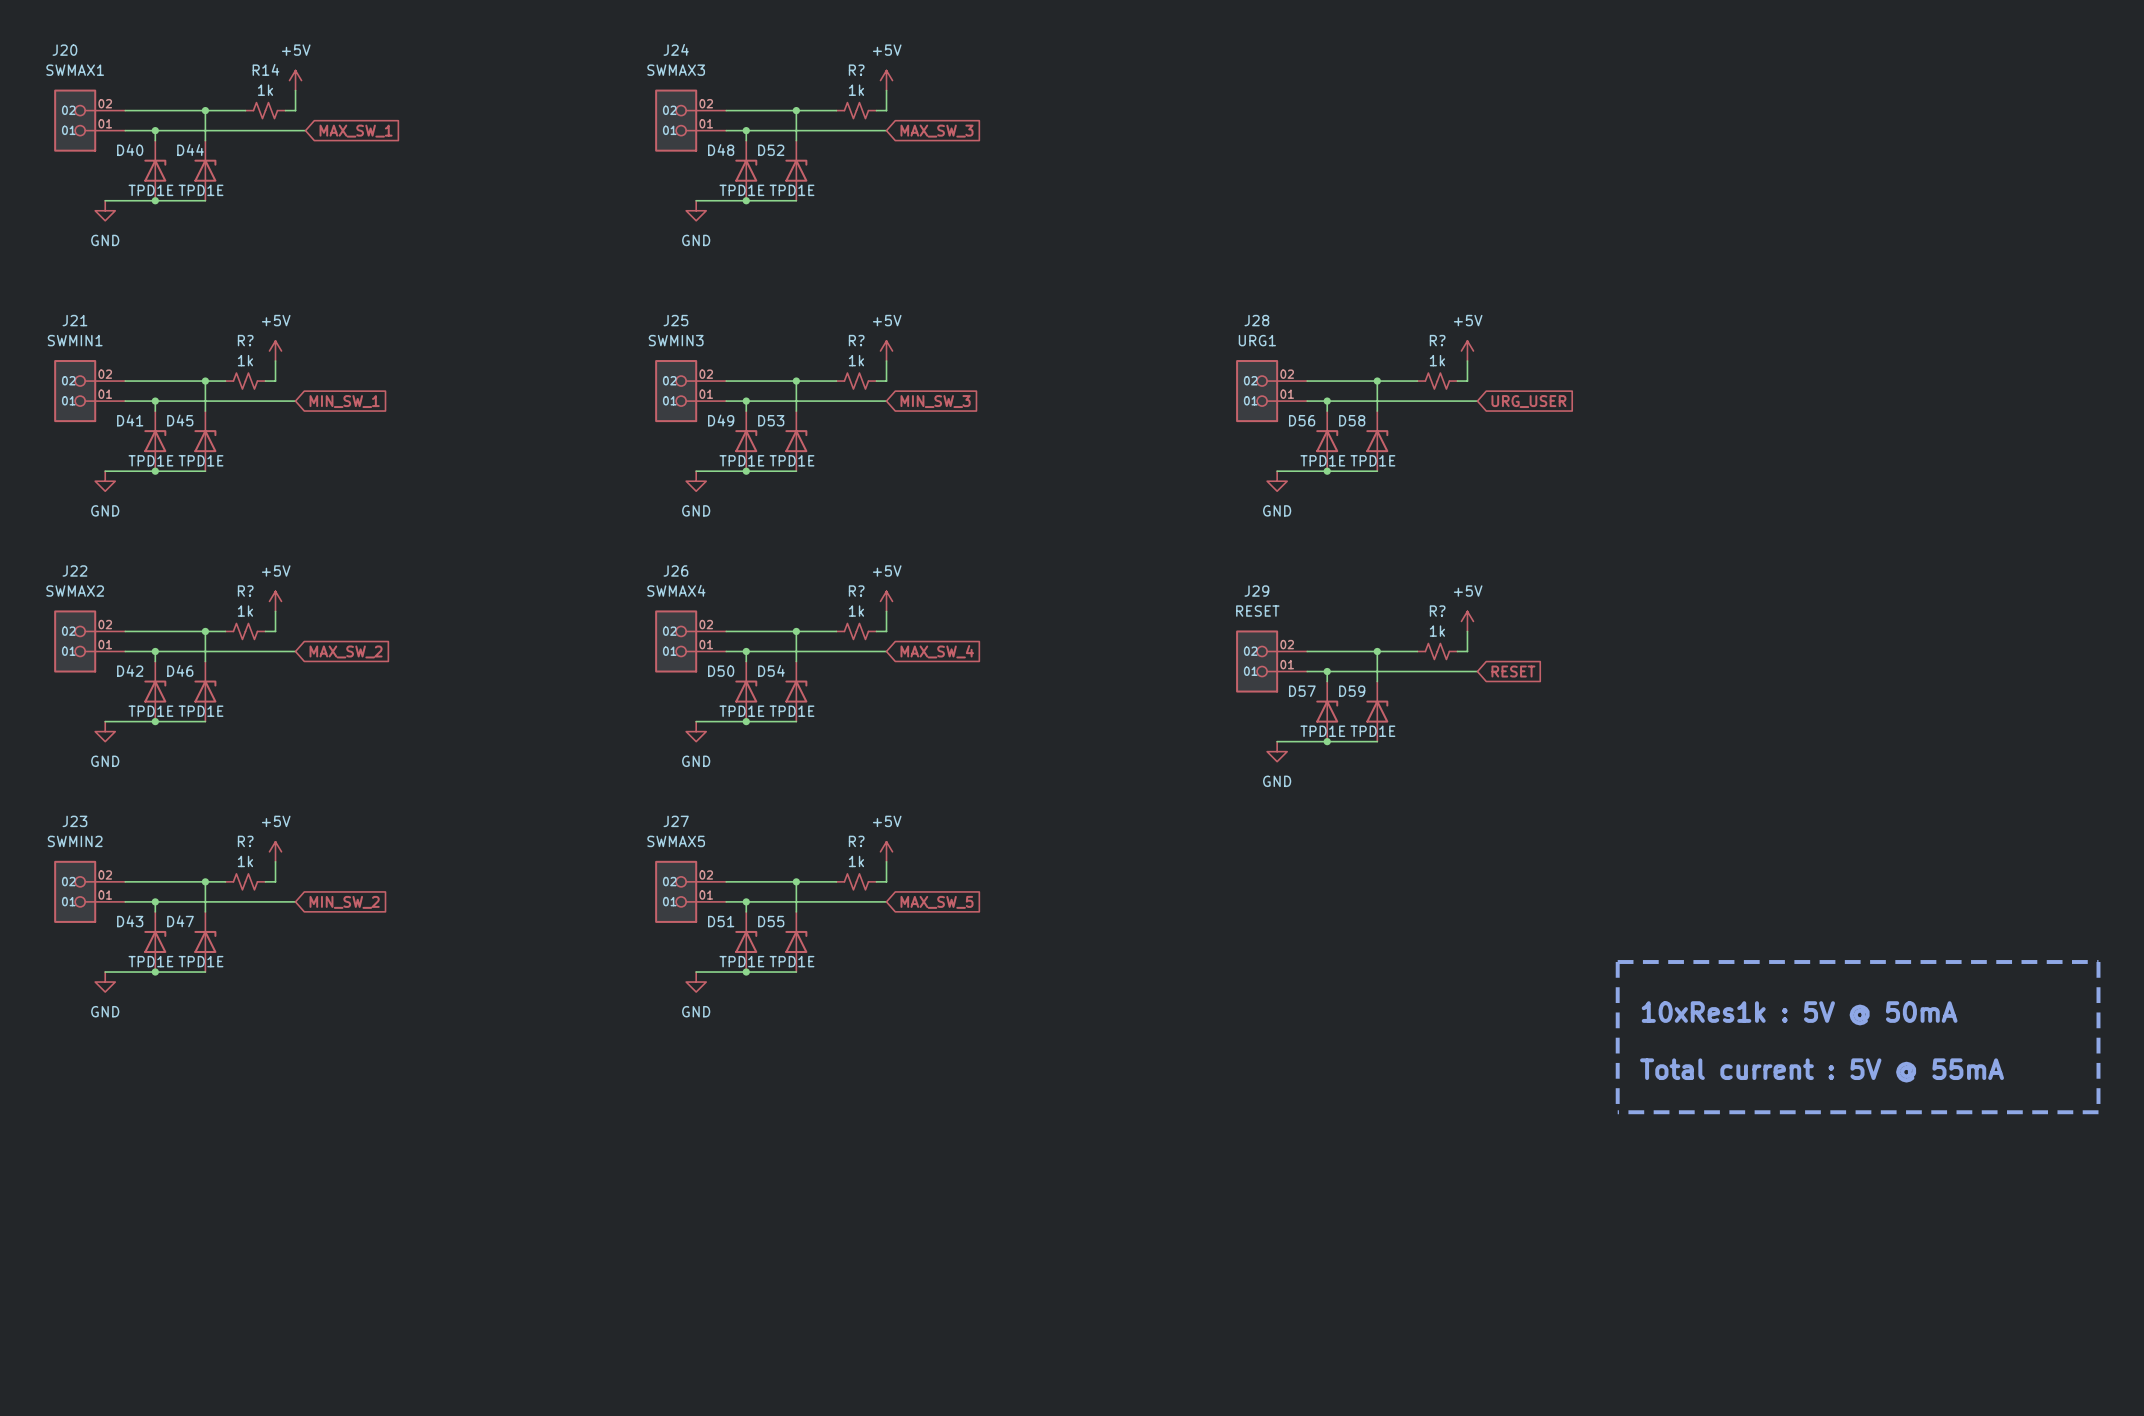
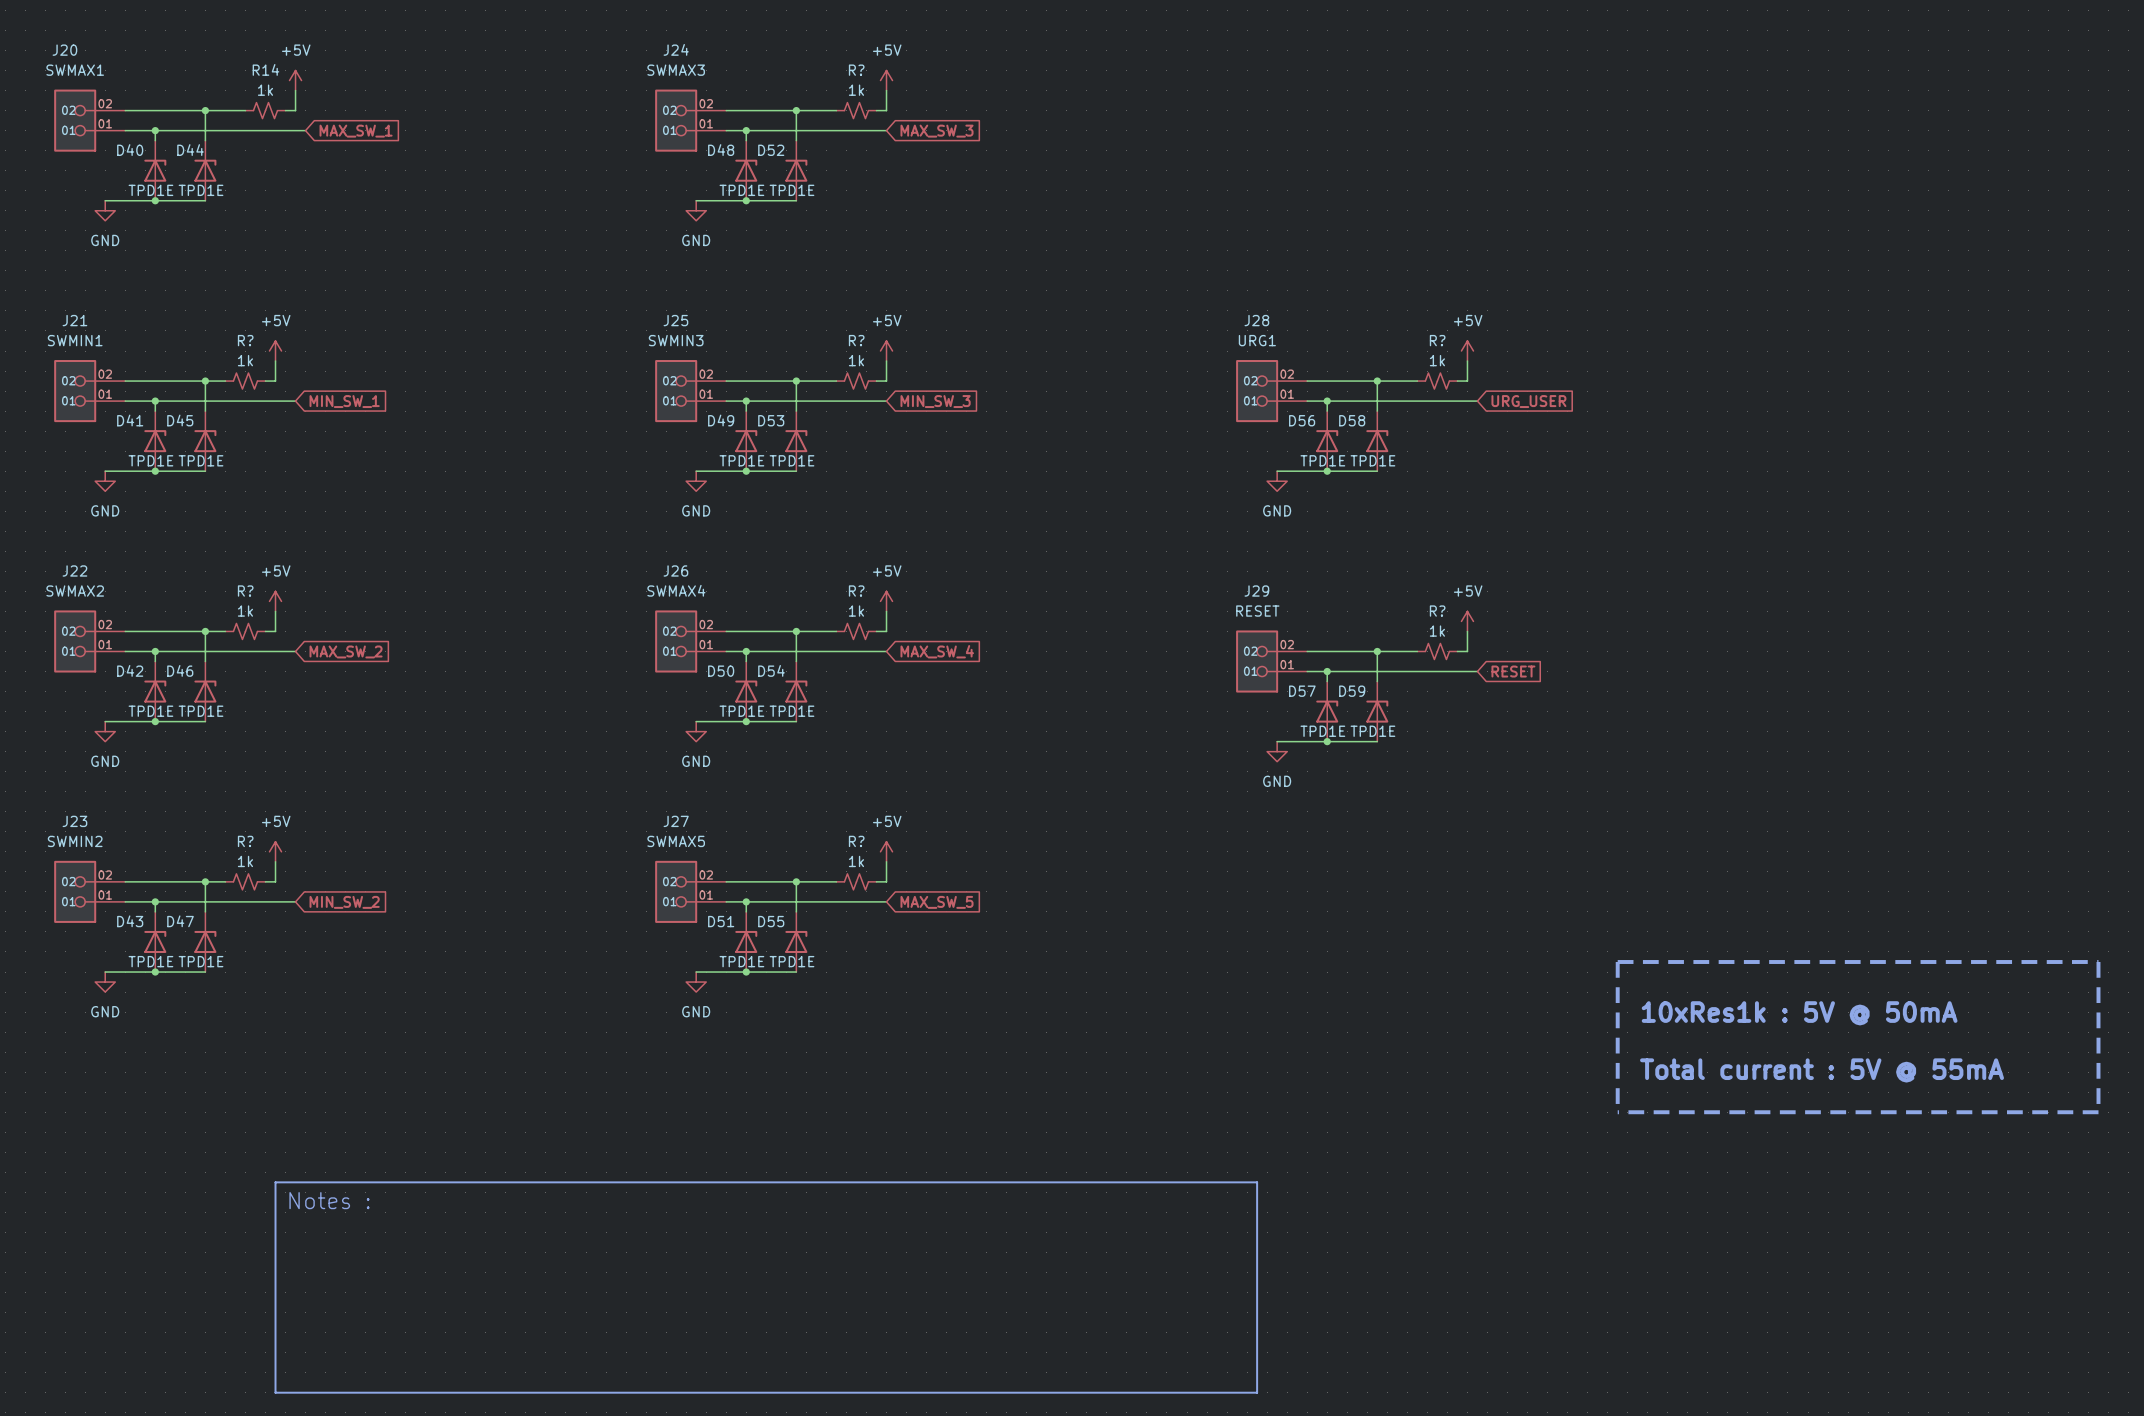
line: none -> (275, 1182) (1257, 1182) (1257, 1392) (275, 1392) (275, 1182)
text: none -> Notes : (329, 1200)

